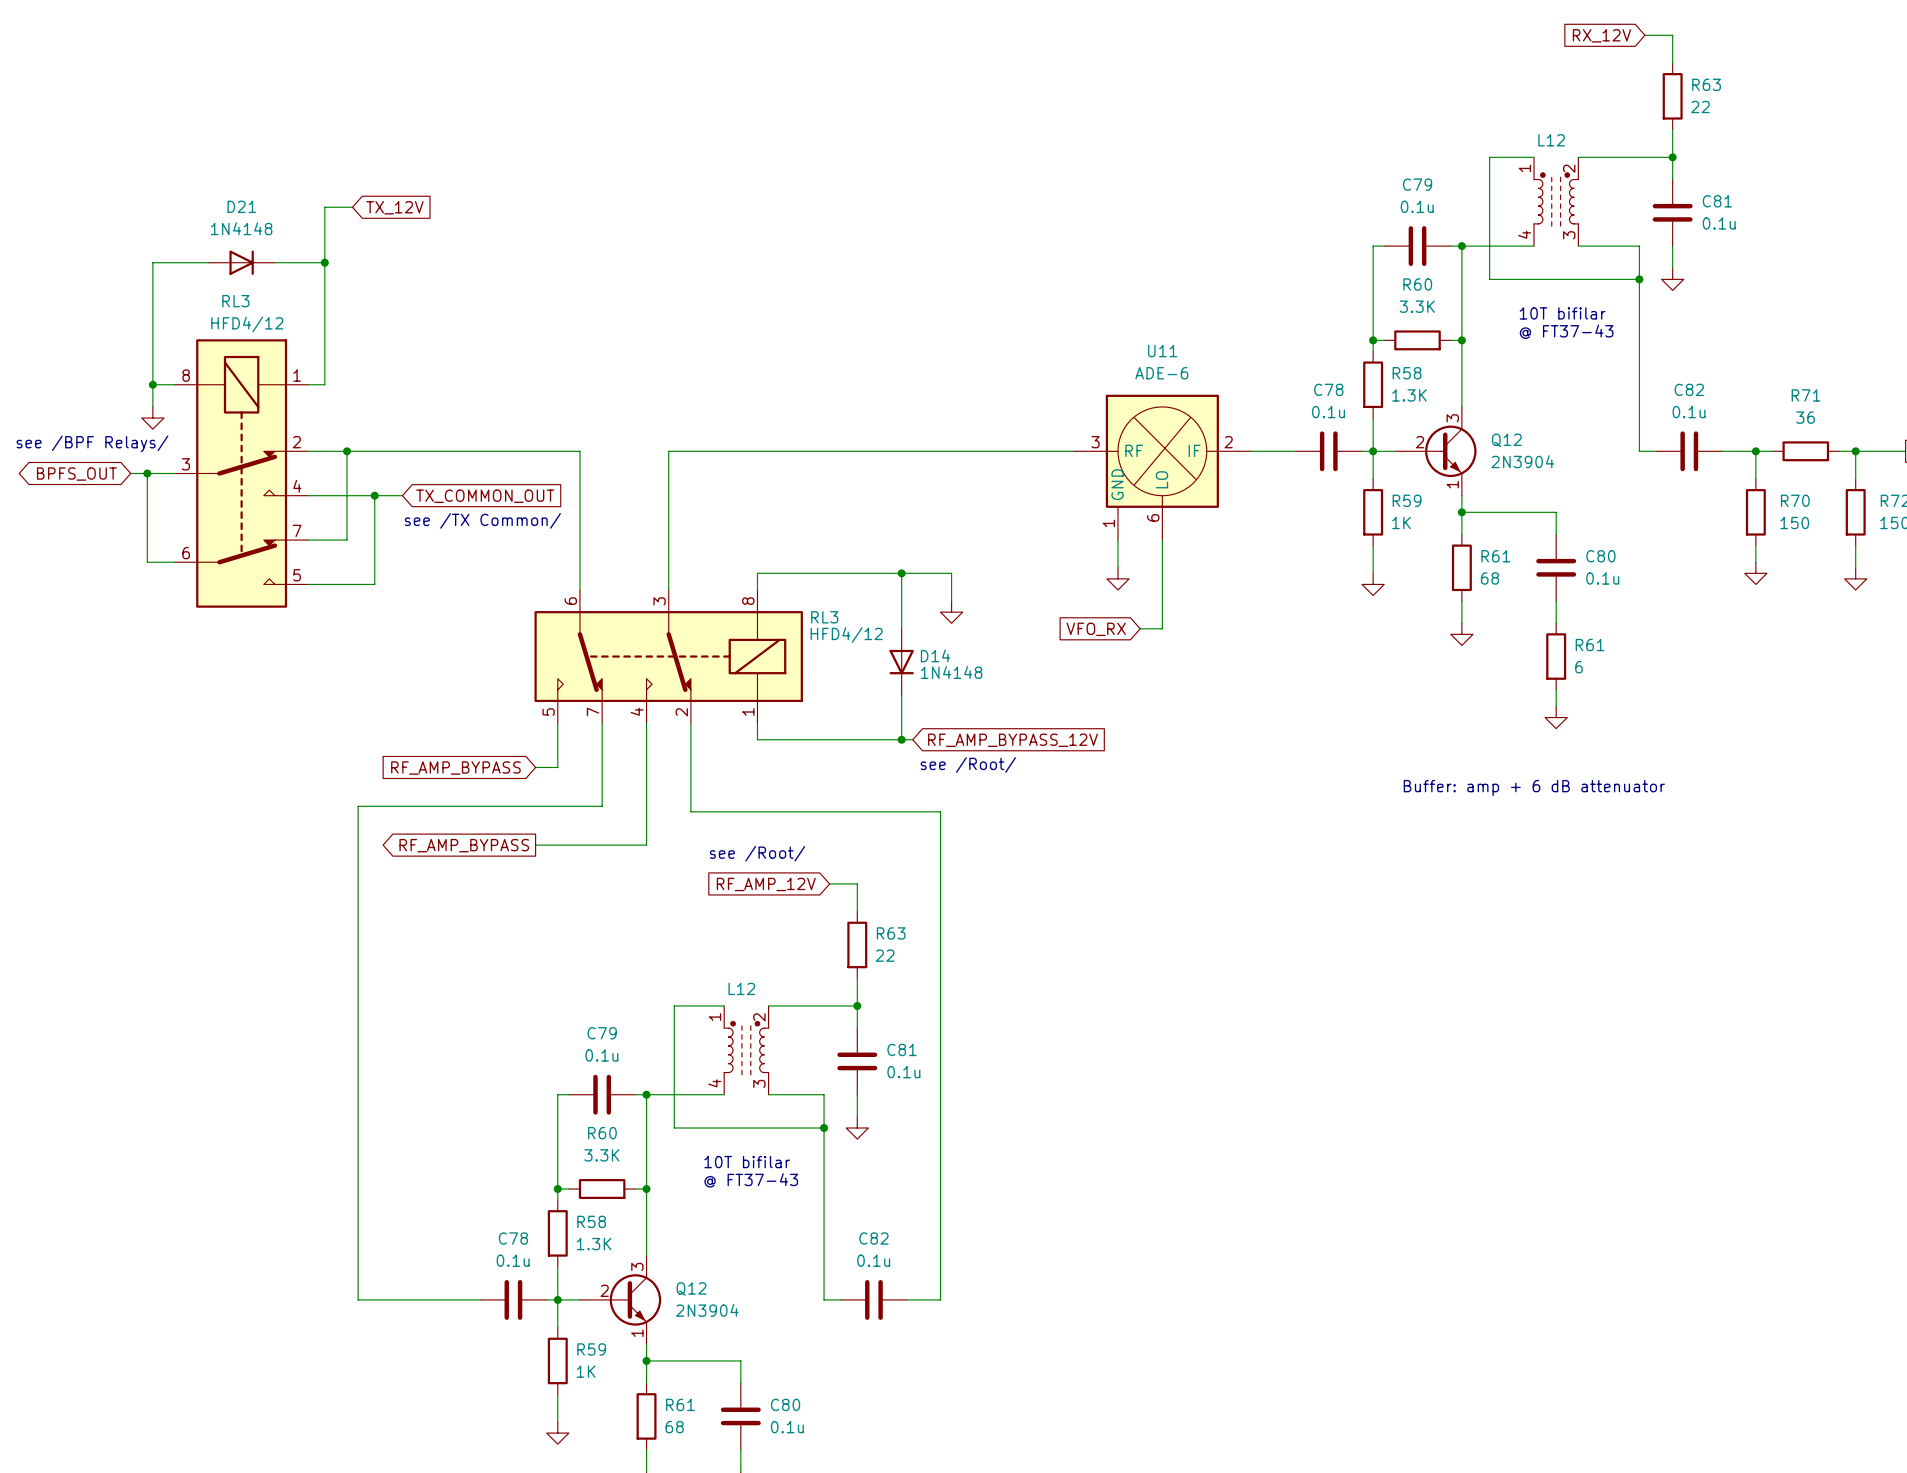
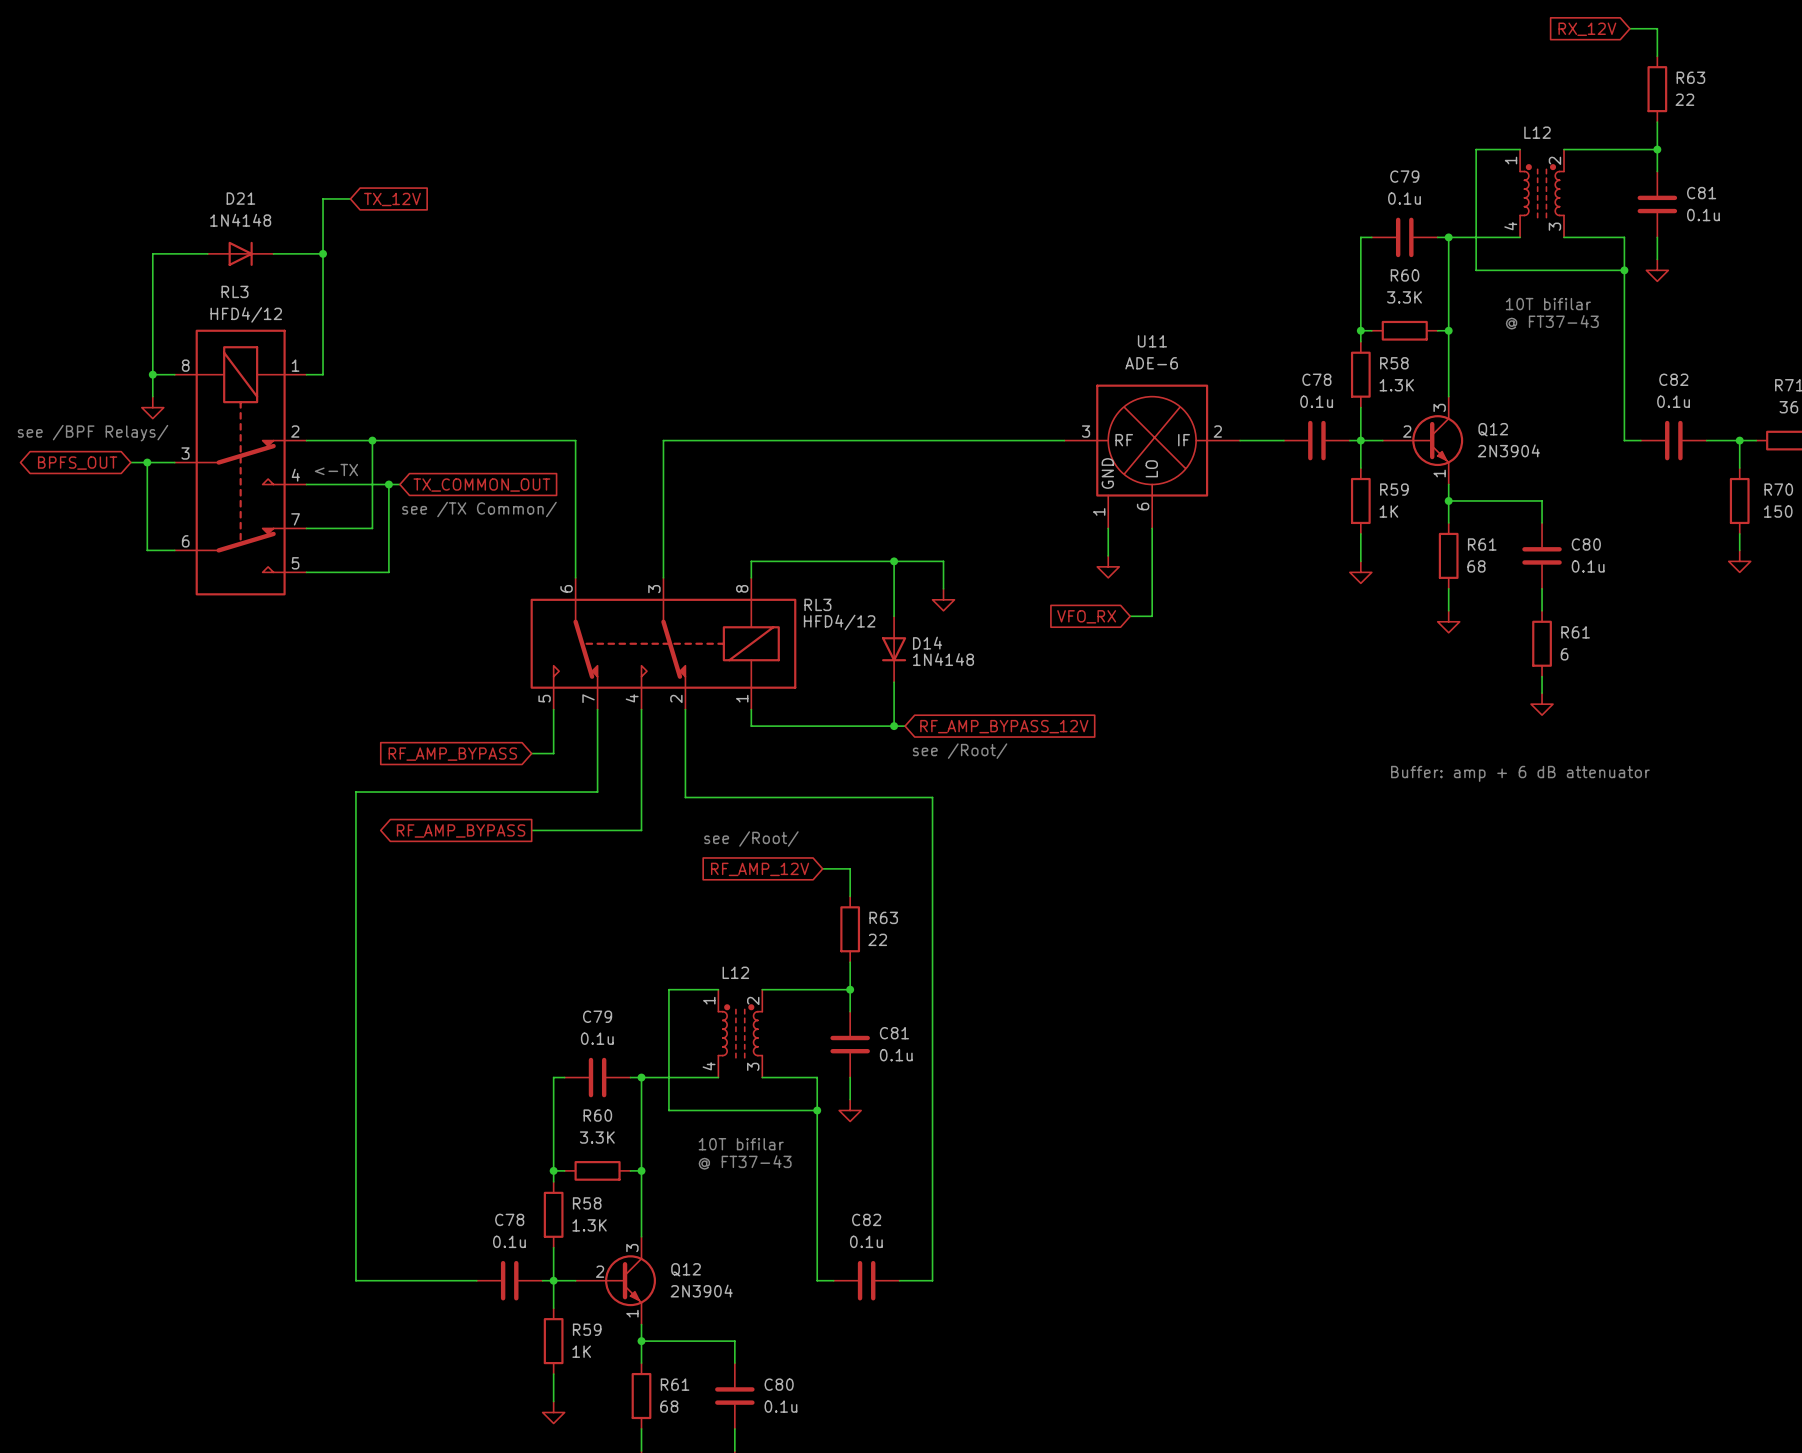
wire: (347, 451) (347, 540) -> (372, 528) (344, 528)
junction: (347, 451) -> none
wire: none -> (372, 440) (372, 484)
junction: none -> (372, 440)
text: none -> <-TX (336, 470)
junction position: (374, 495) -> (388, 484)
wire: (374, 540) (374, 584) -> (388, 484) (388, 572) (372, 572)

